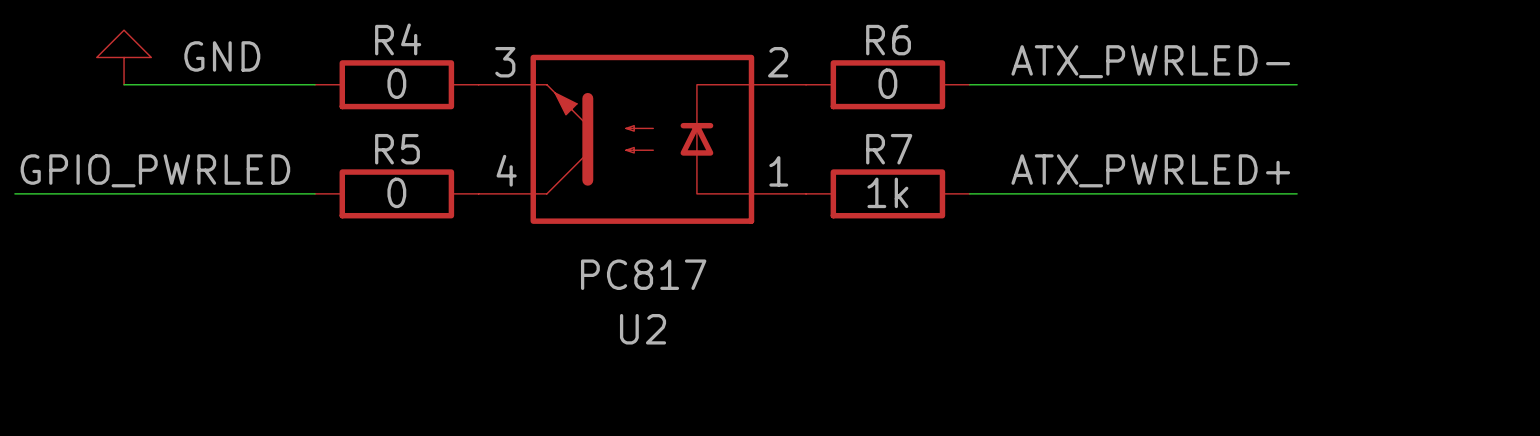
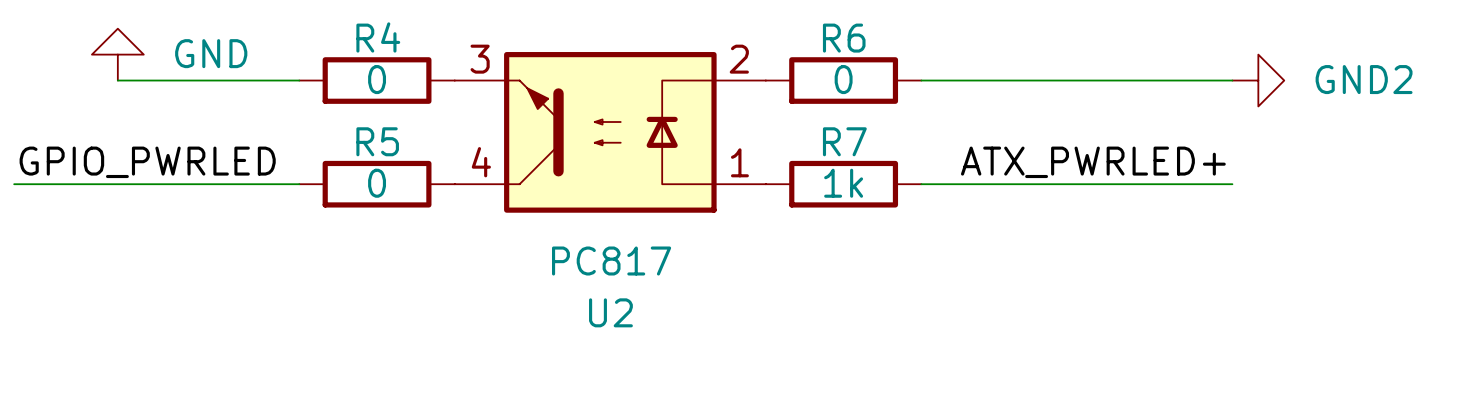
label: ATX_PWRLED- (1150, 61) -> none
power symbol: none -> GND2 (1258, 80)

